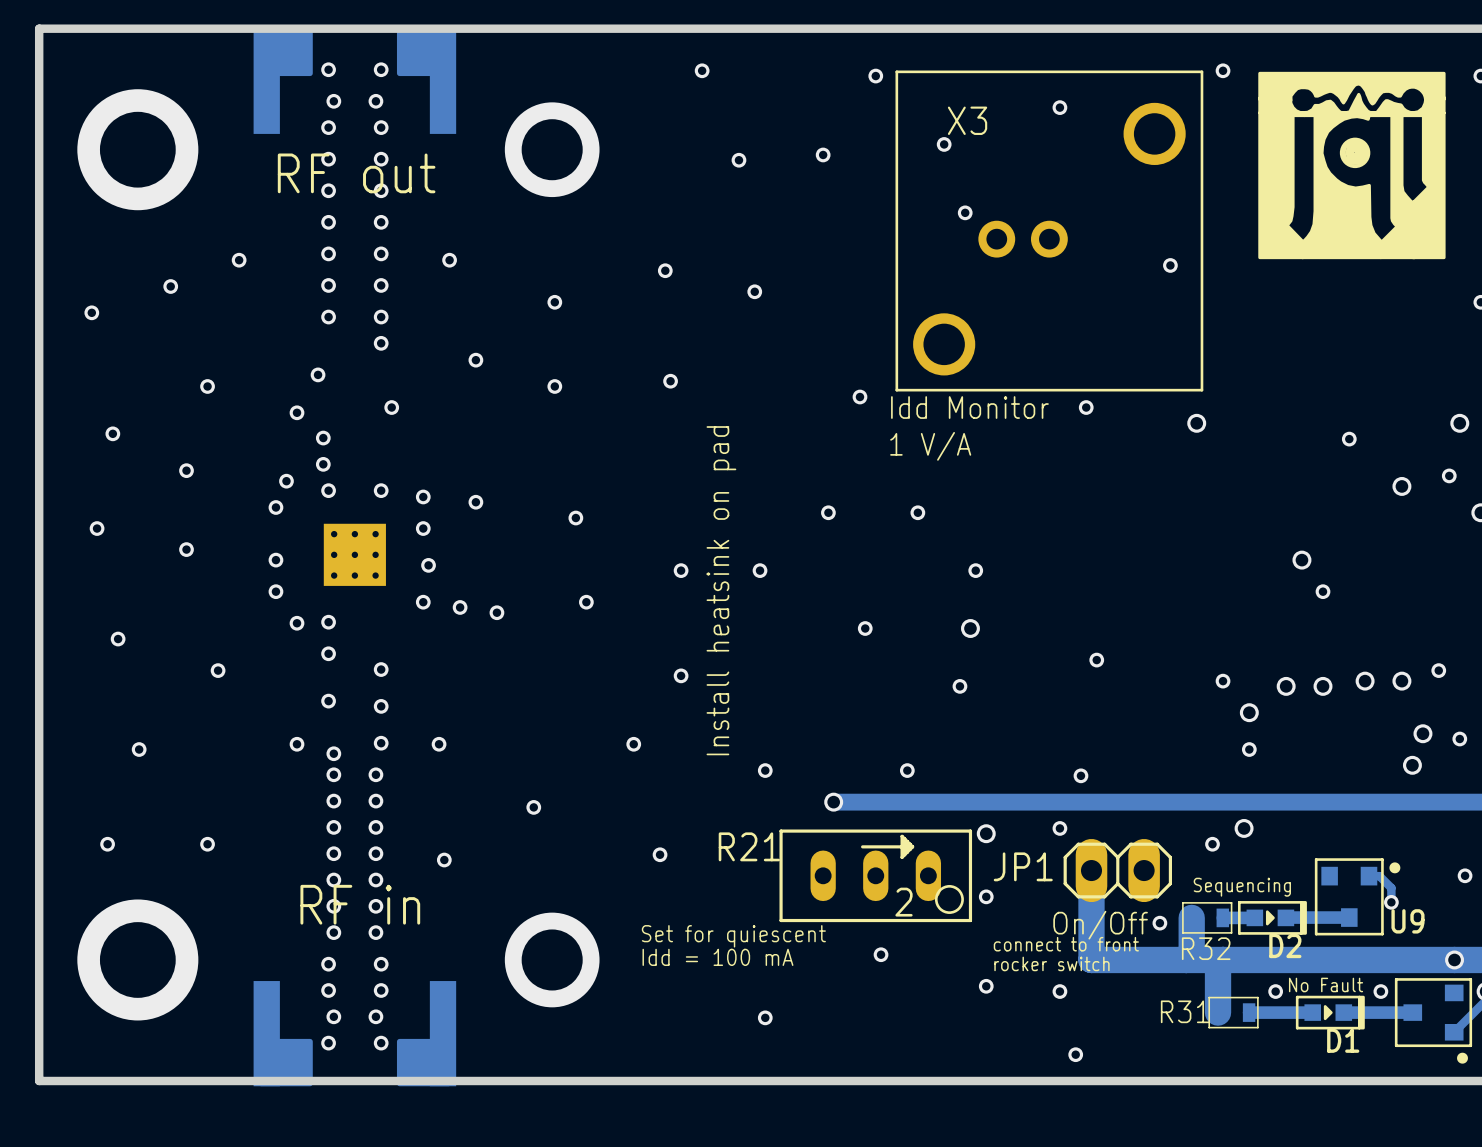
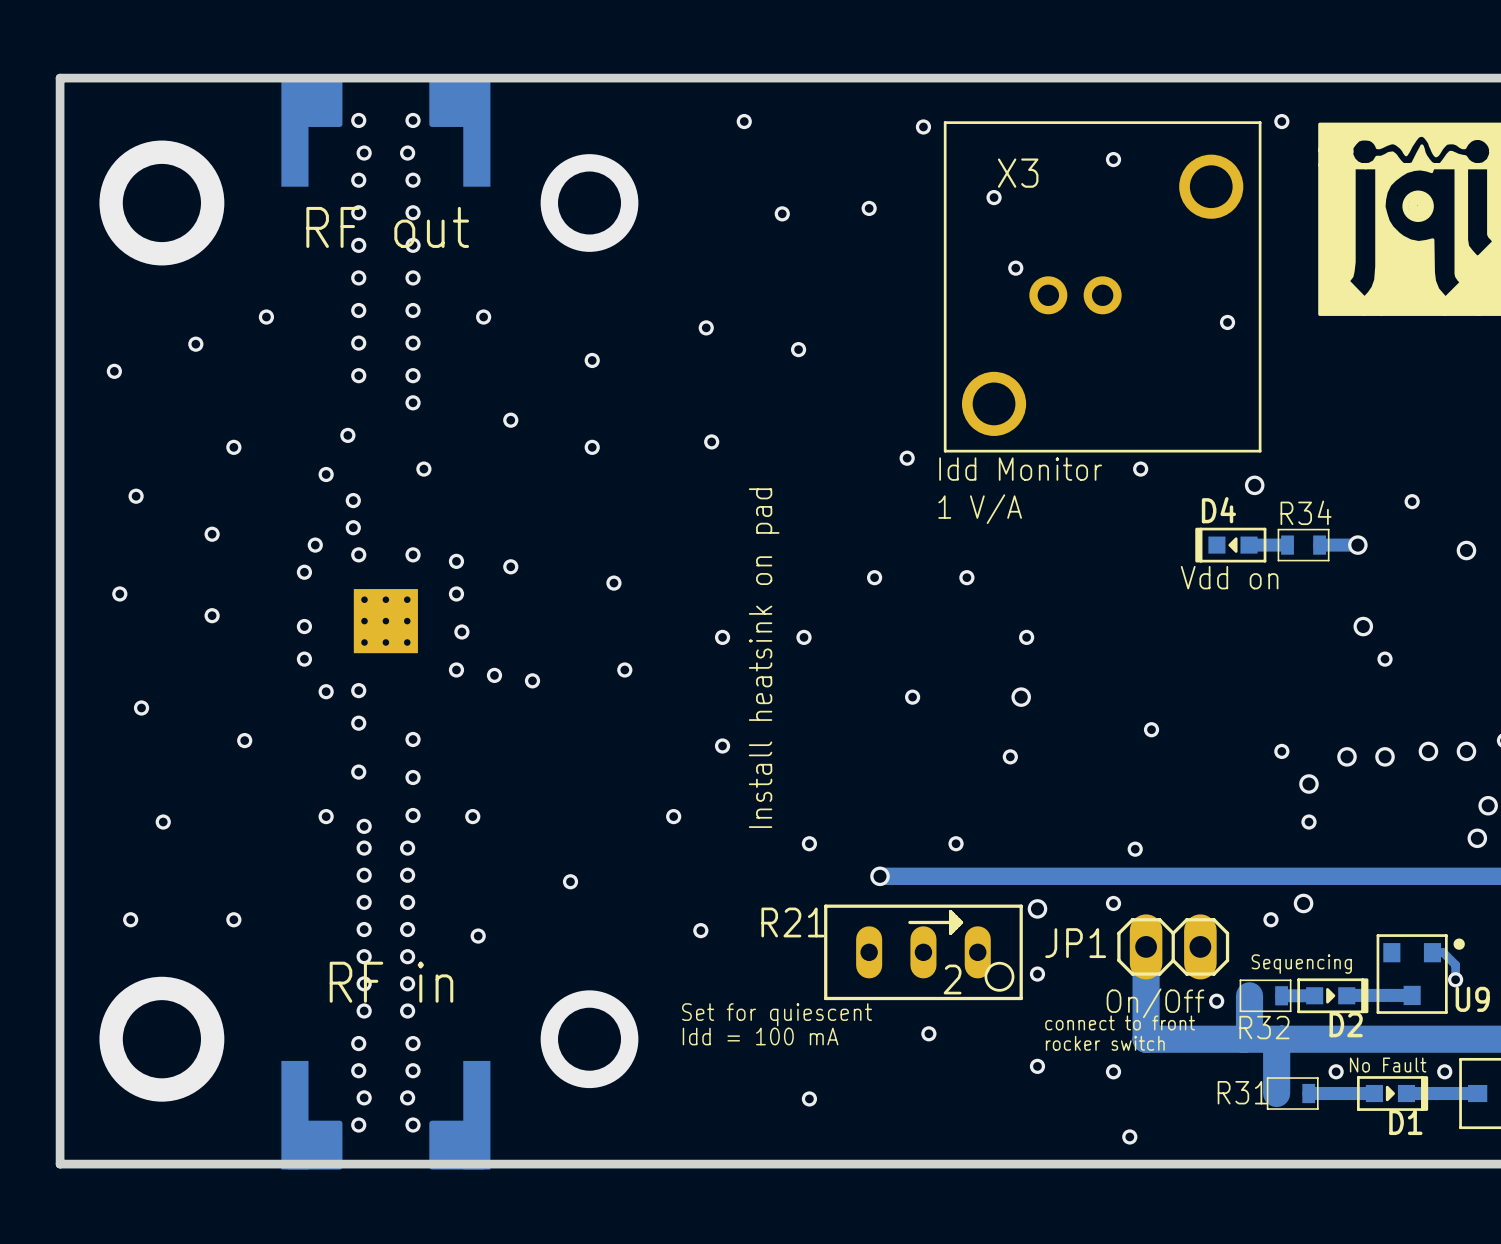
D4: none -> (1230, 545)
track: none -> (1287, 545) (1249, 545)
R34: none -> (1303, 545)
track: none -> (1357, 545) (1319, 545)
via: none -> (1357, 545)
text: none -> Vdd on (1229, 577)

